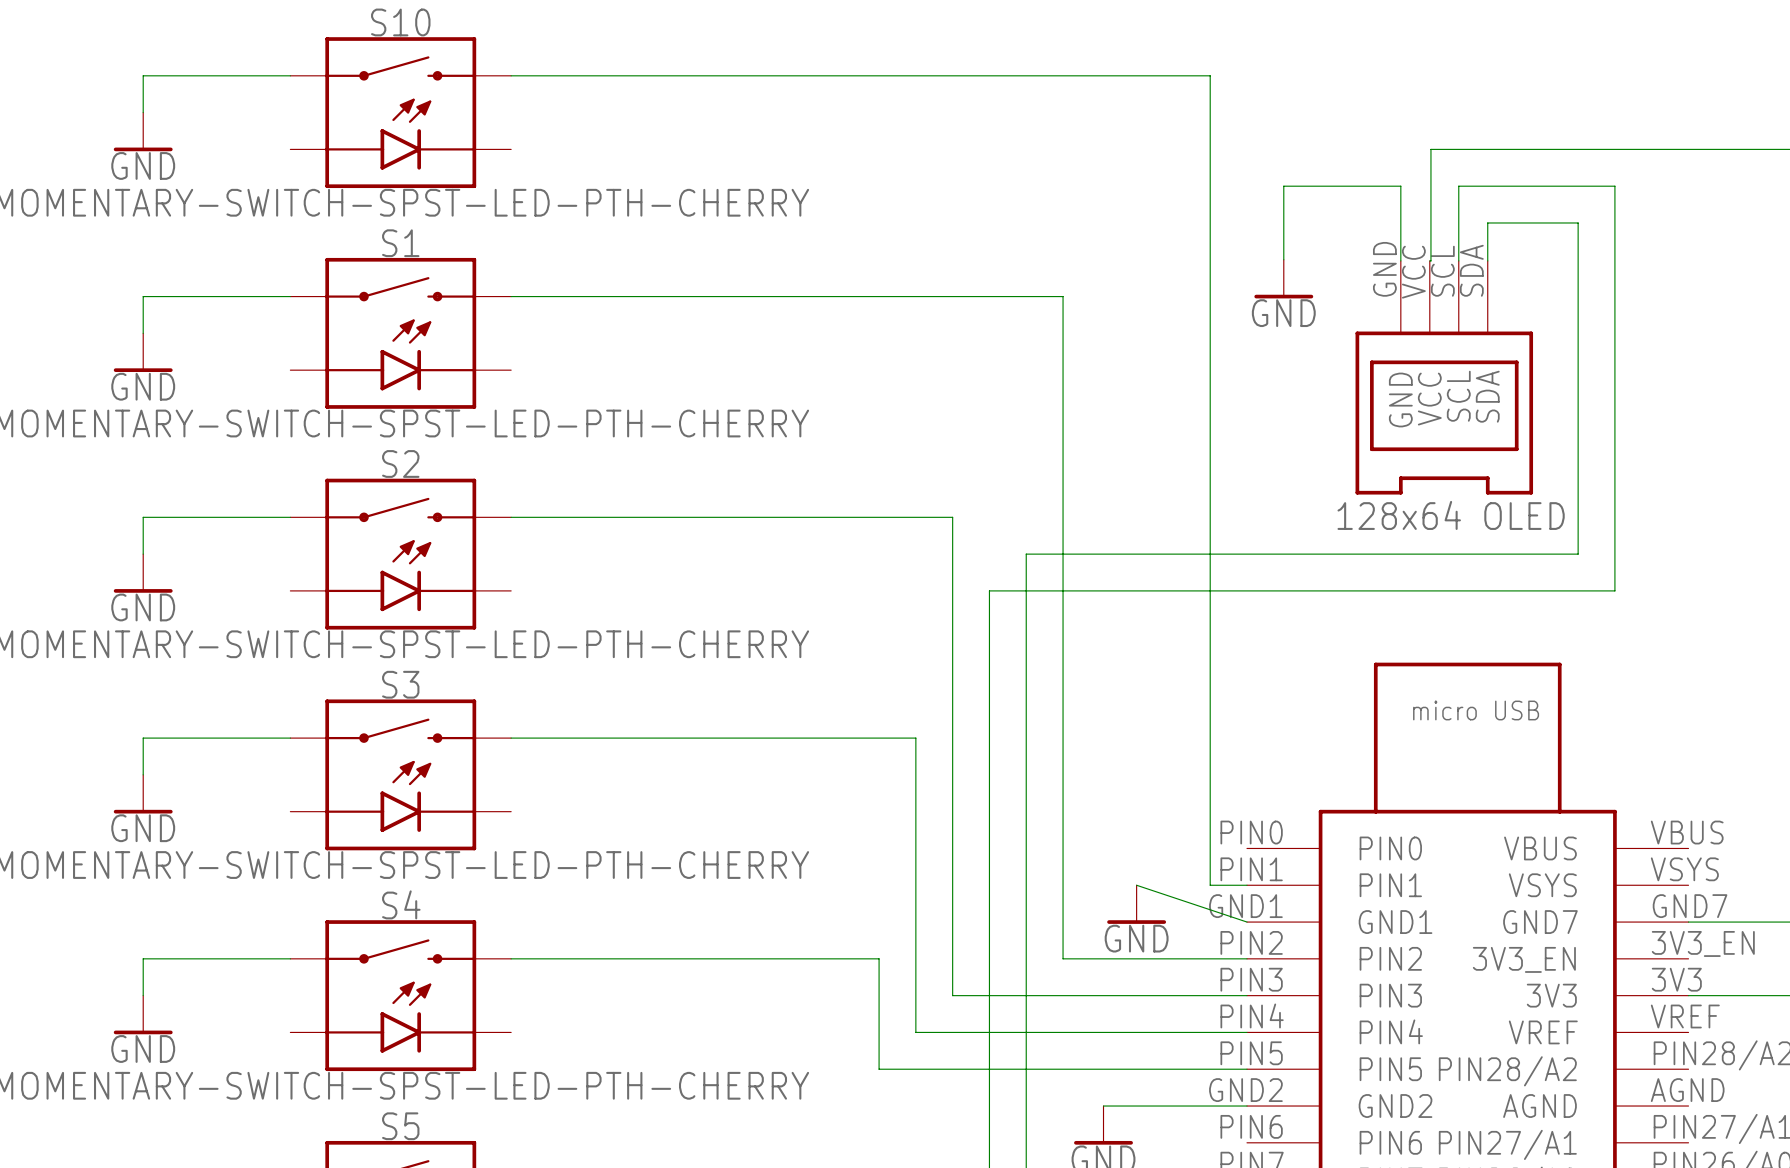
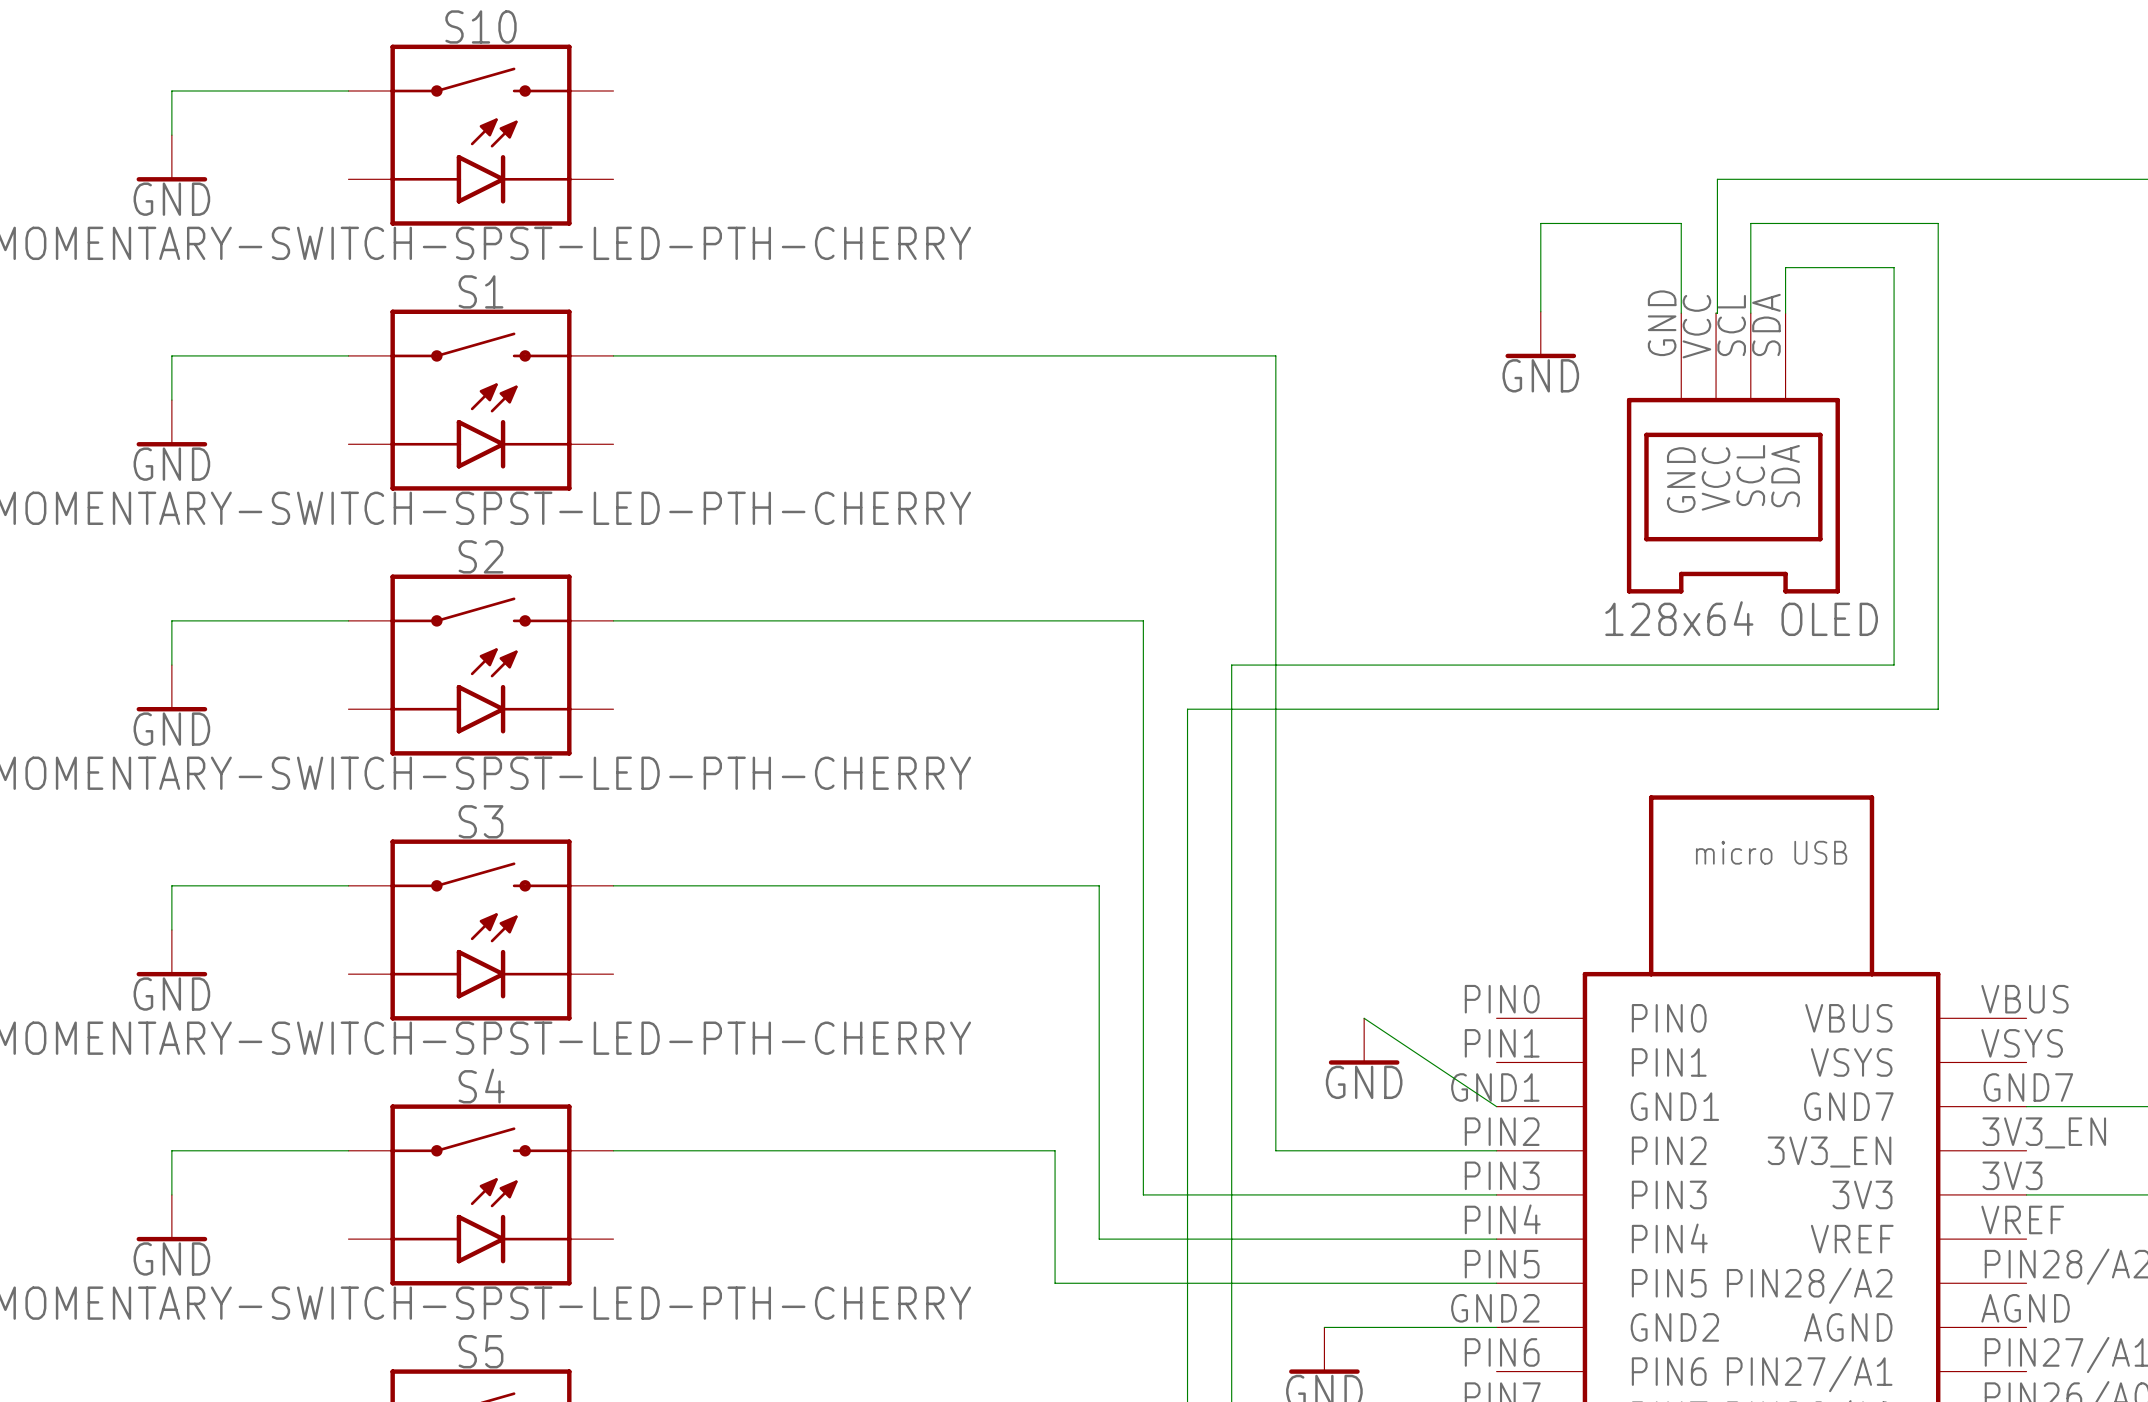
wire: (511, 75) (1210, 75) (1210, 885) (1247, 885) -> none
wire: (1136, 885) (1247, 922) -> (1364, 1018) (1496, 1106)
power symbol position: GND (1136, 904) -> GND (1364, 1041)

